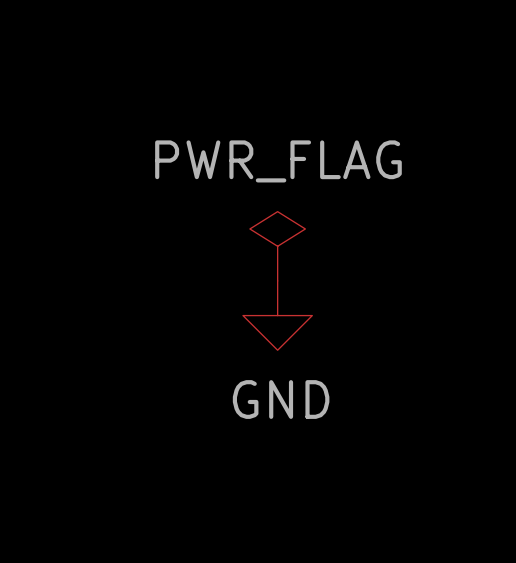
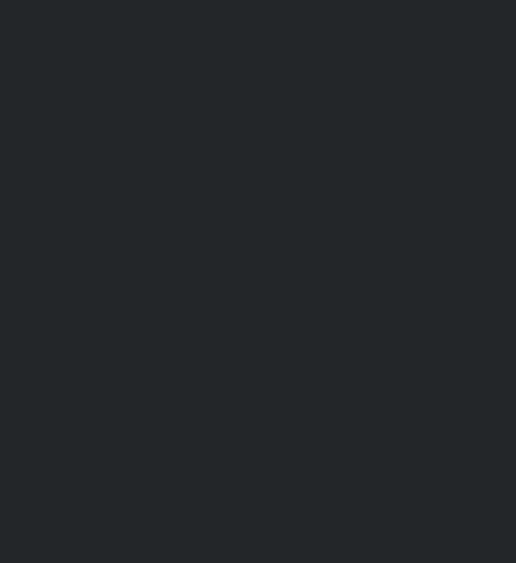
power symbol: PWR_FLAG (277, 246) -> none
power symbol: GND (277, 315) -> none

